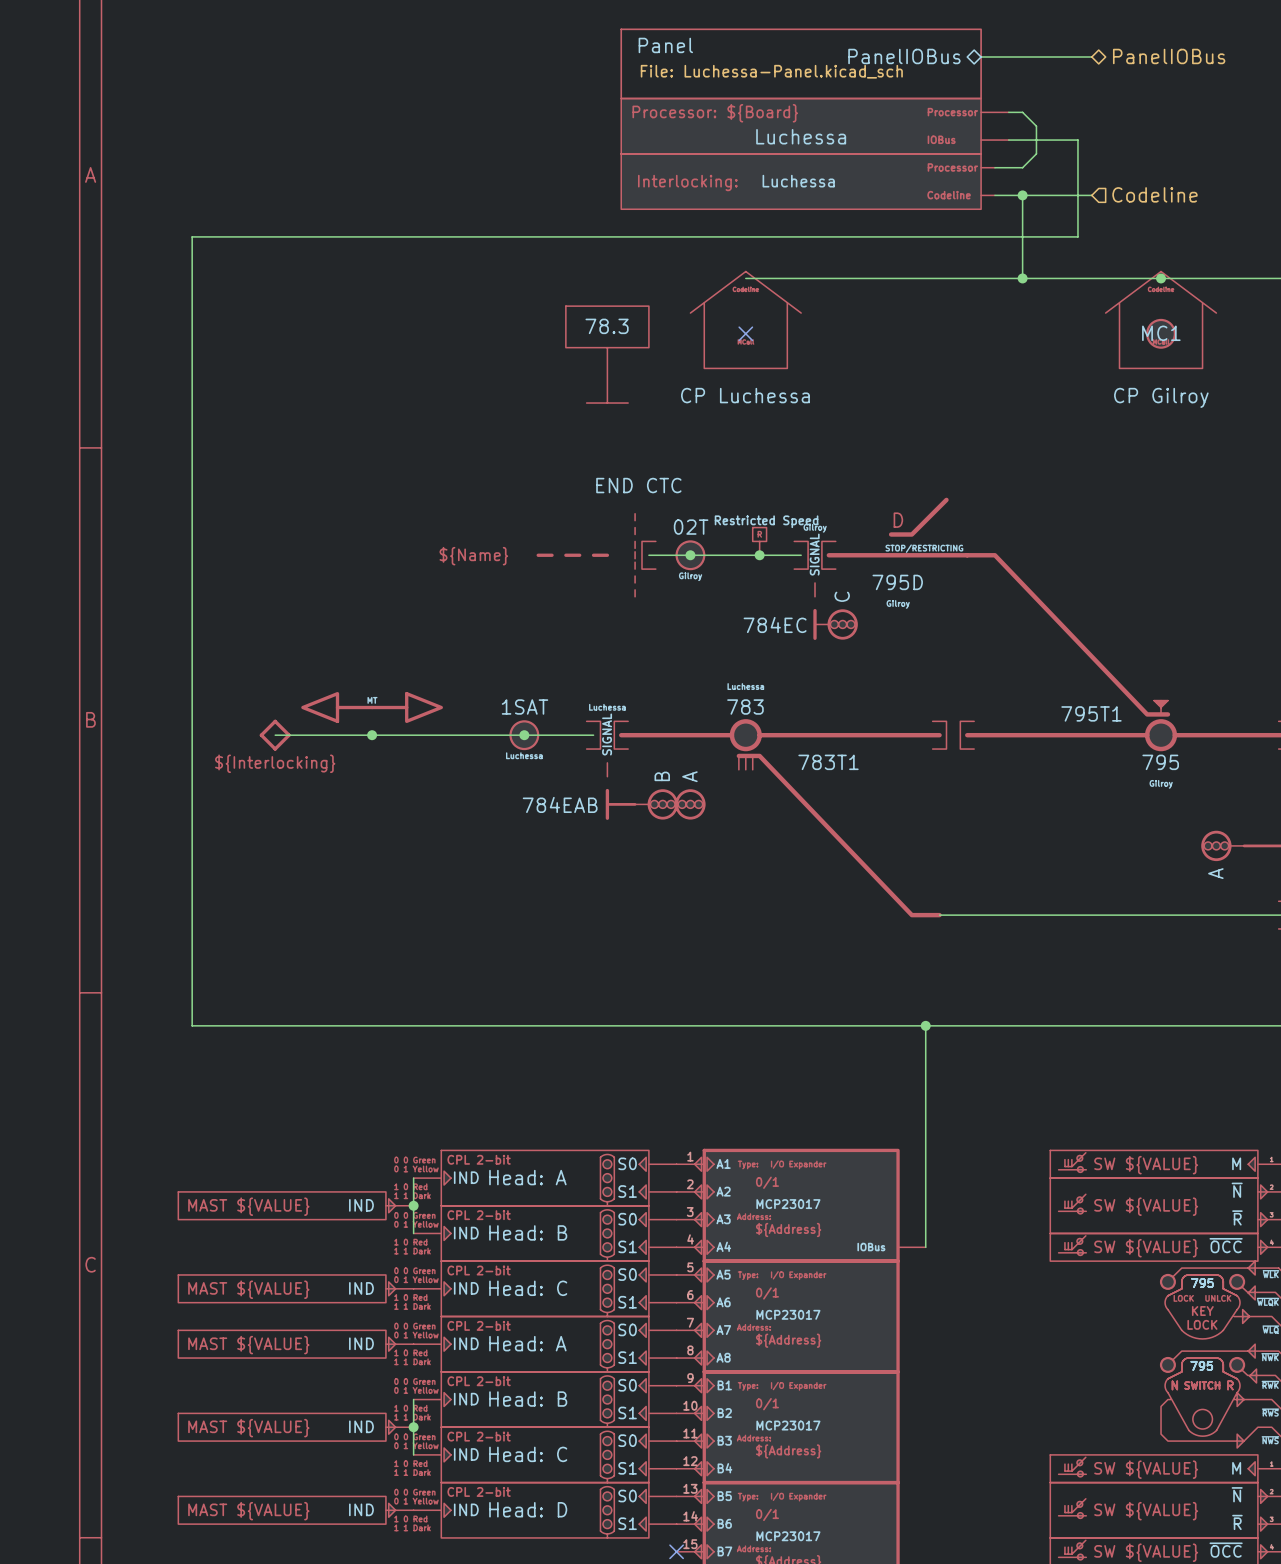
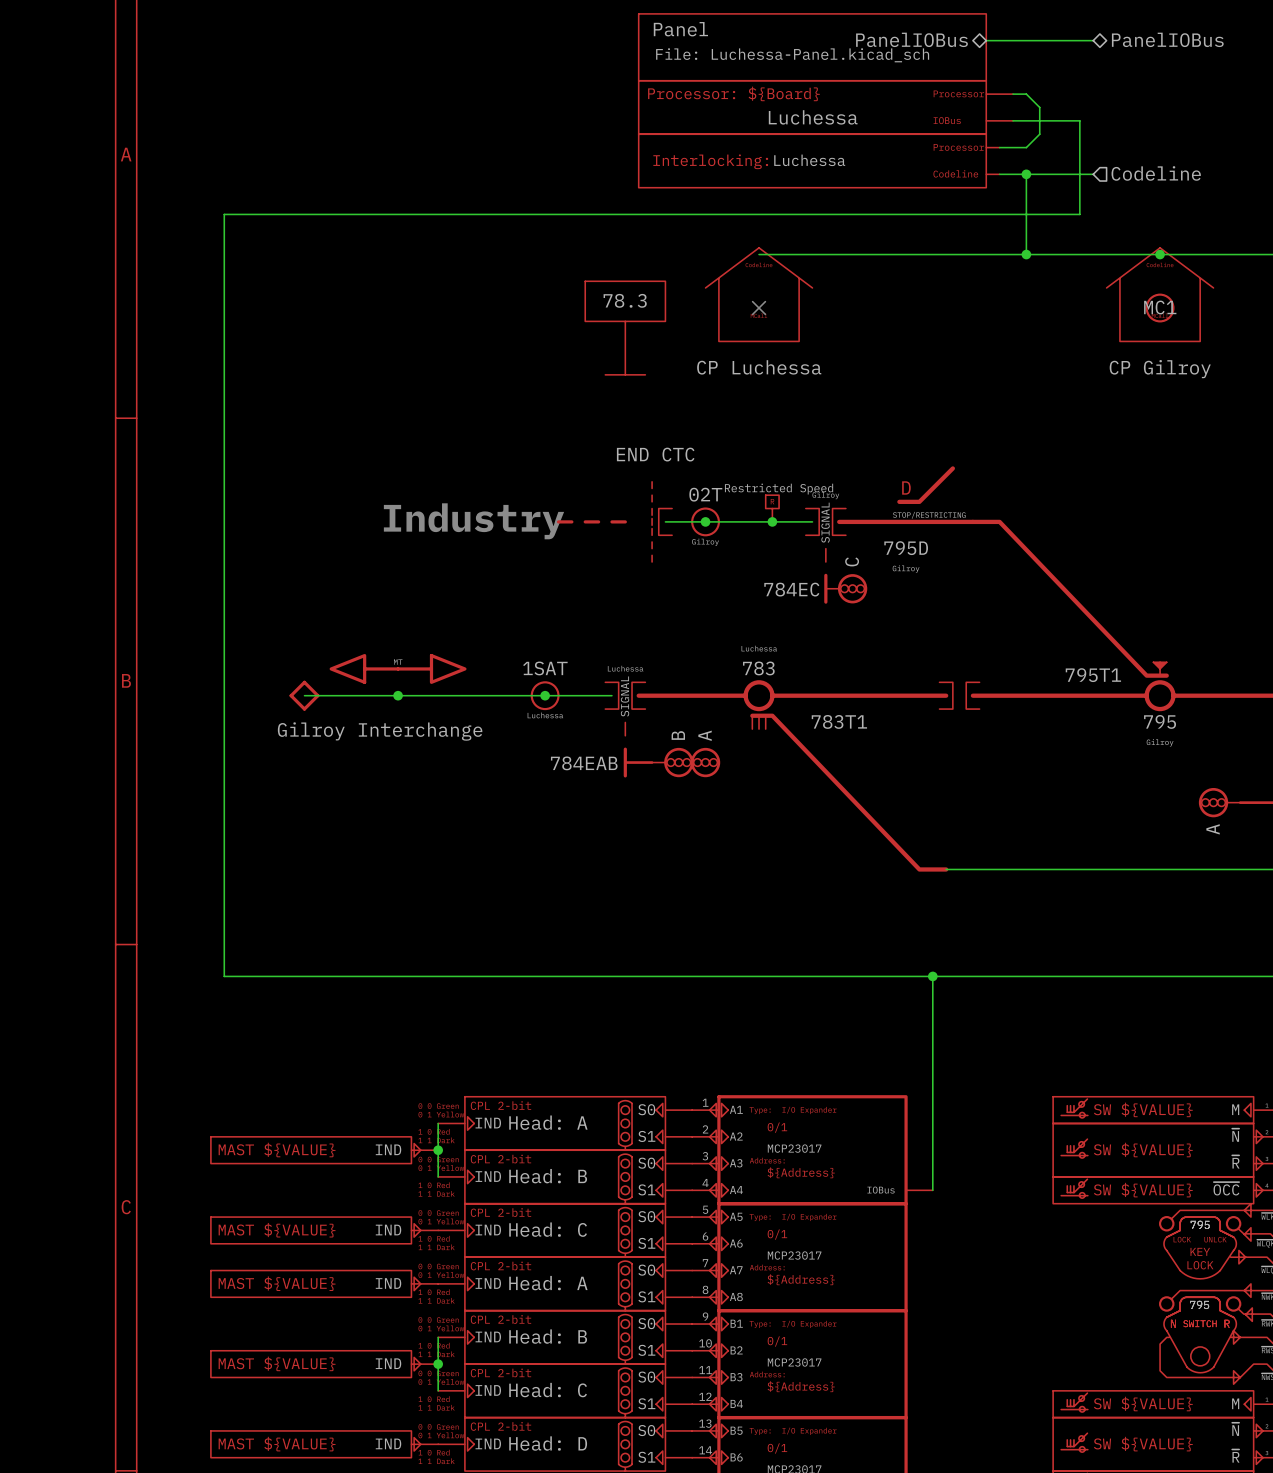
text: none -> Industry (474, 521)
part text: ${Name} (473, 556) -> none
part text: ${Interlocking} (275, 763) -> none
part value: none -> Gilroy Interchange (380, 731)

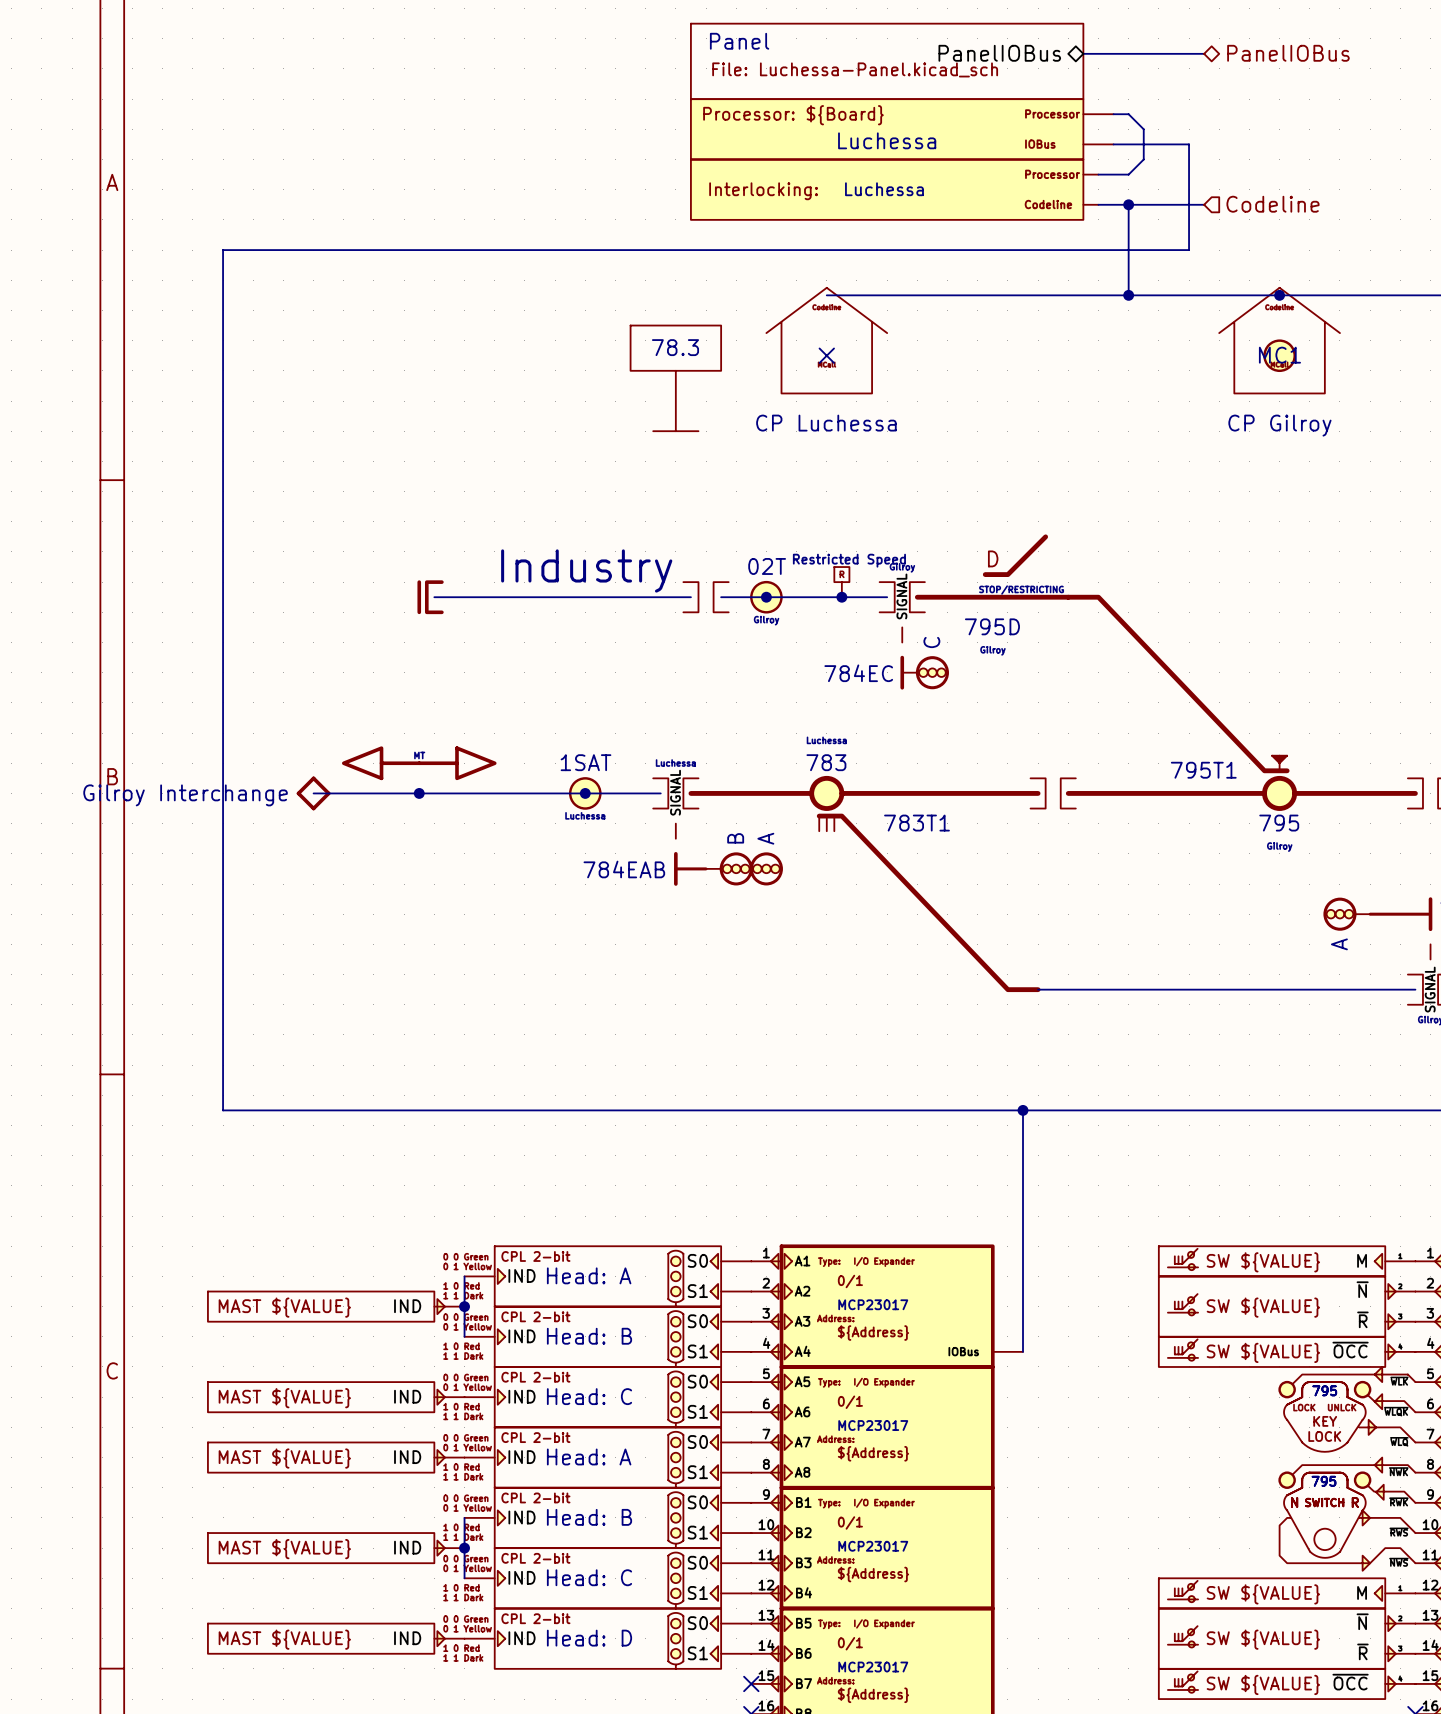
part value: END CTC (655, 454) -> none
part symbol: [652, 481, 673, 563] -> [683, 582, 729, 613]
part: none -> (430, 597)
wire: none -> (434, 597) (690, 597)
text position: Industry (474, 521) -> Industry (586, 570)
part: (591, 521) -> none
part value position: Gilroy Interchange (380, 731) -> Gilroy Interchange (185, 795)

